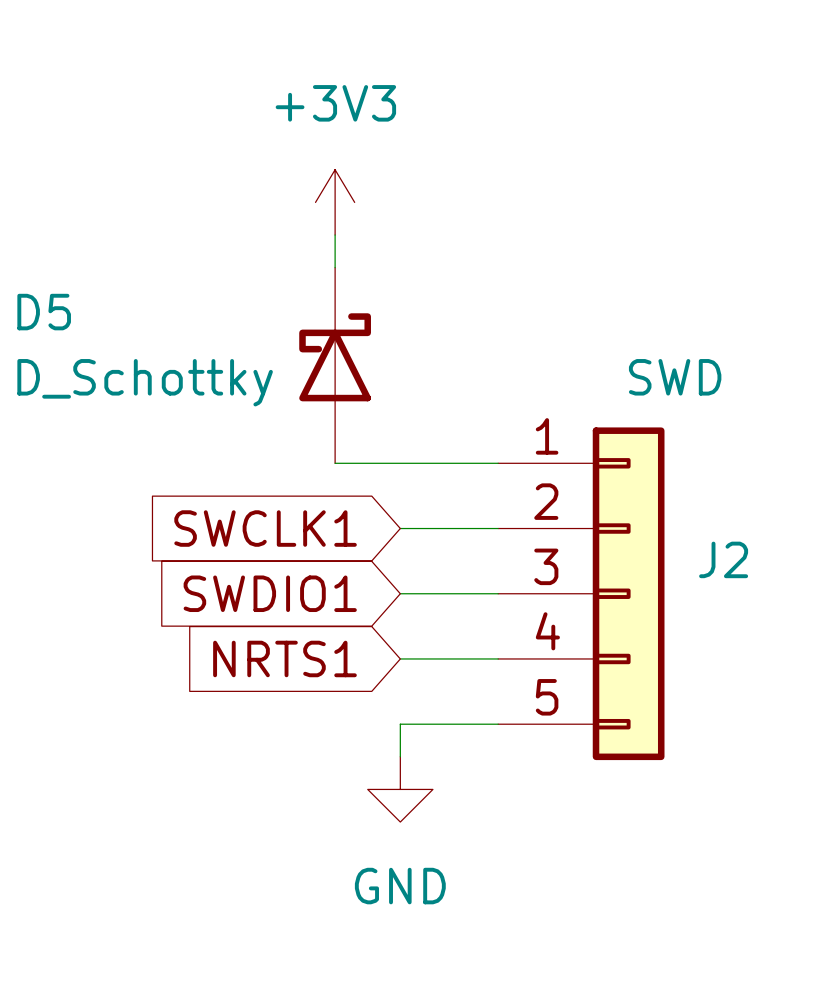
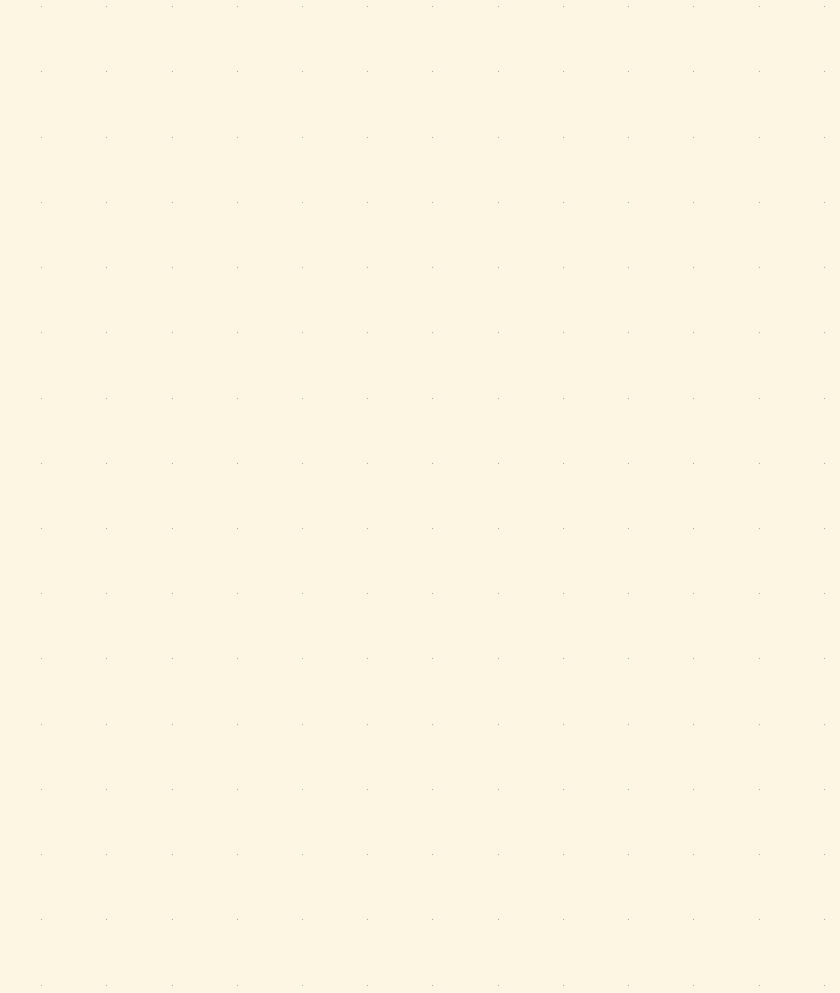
power symbol: +3V3 (335, 202) -> none
wire: (335, 235) (335, 267) -> none
D5: D_Schottky (335, 365) -> none
wire: (335, 463) (498, 463) -> none
global label: SWCLK1 (265, 528) -> none
wire: (400, 528) (498, 528) -> none
global label: SWDIO1 (270, 593) -> none
wire: (400, 593) (498, 593) -> none
J2: SWD (581, 593) -> none
global label: NRTS1 (284, 658) -> none
wire: (400, 658) (498, 658) -> none
wire: (498, 724) (400, 724) (400, 756) -> none
power symbol: GND (400, 789) -> none

